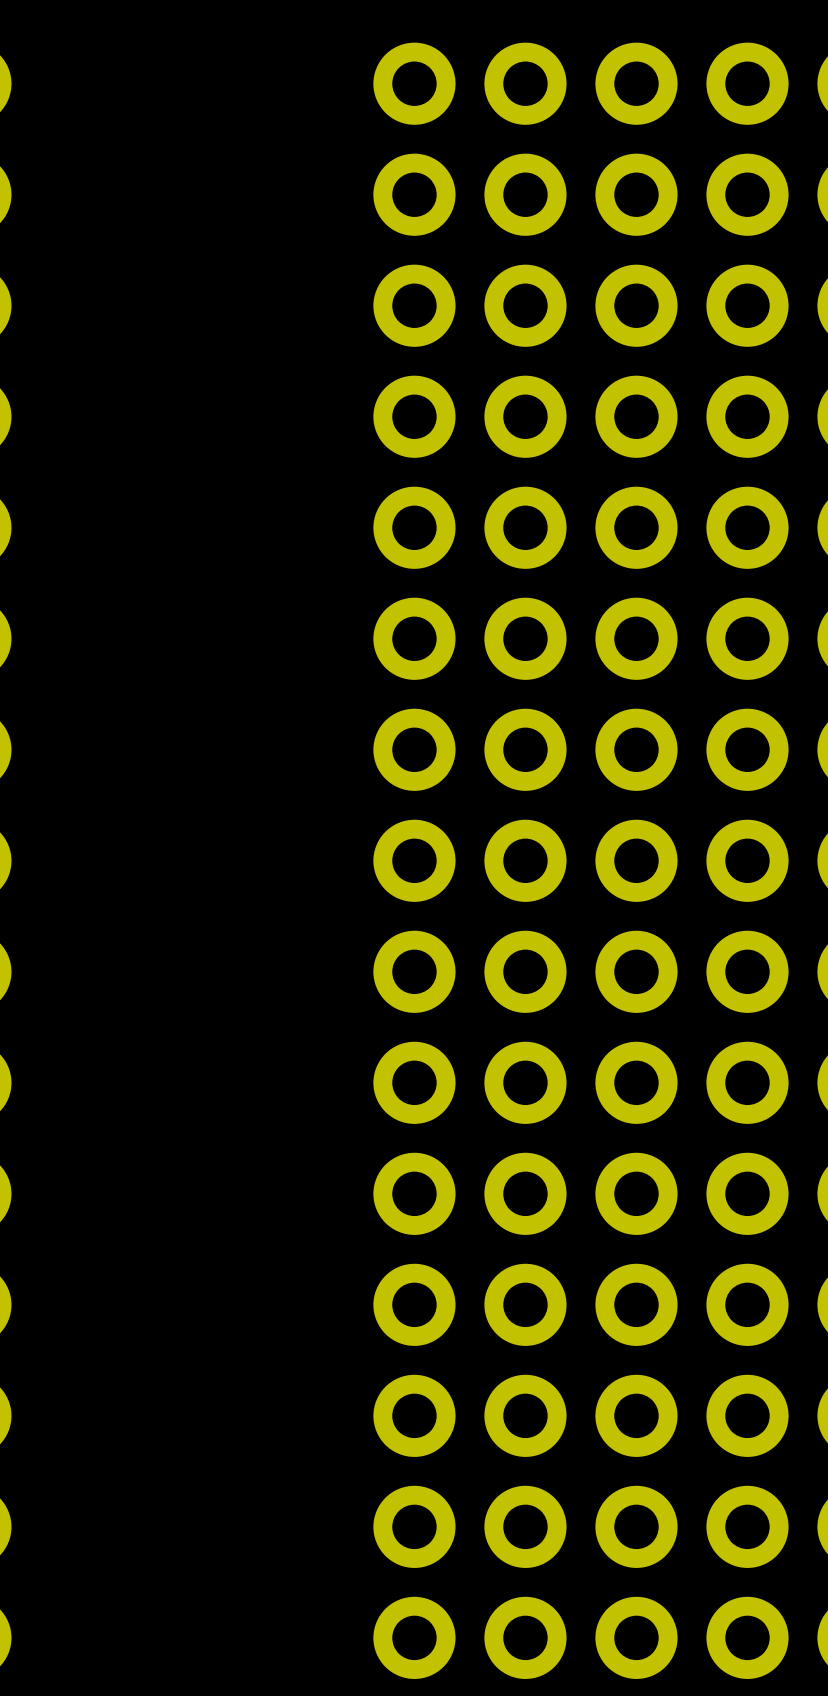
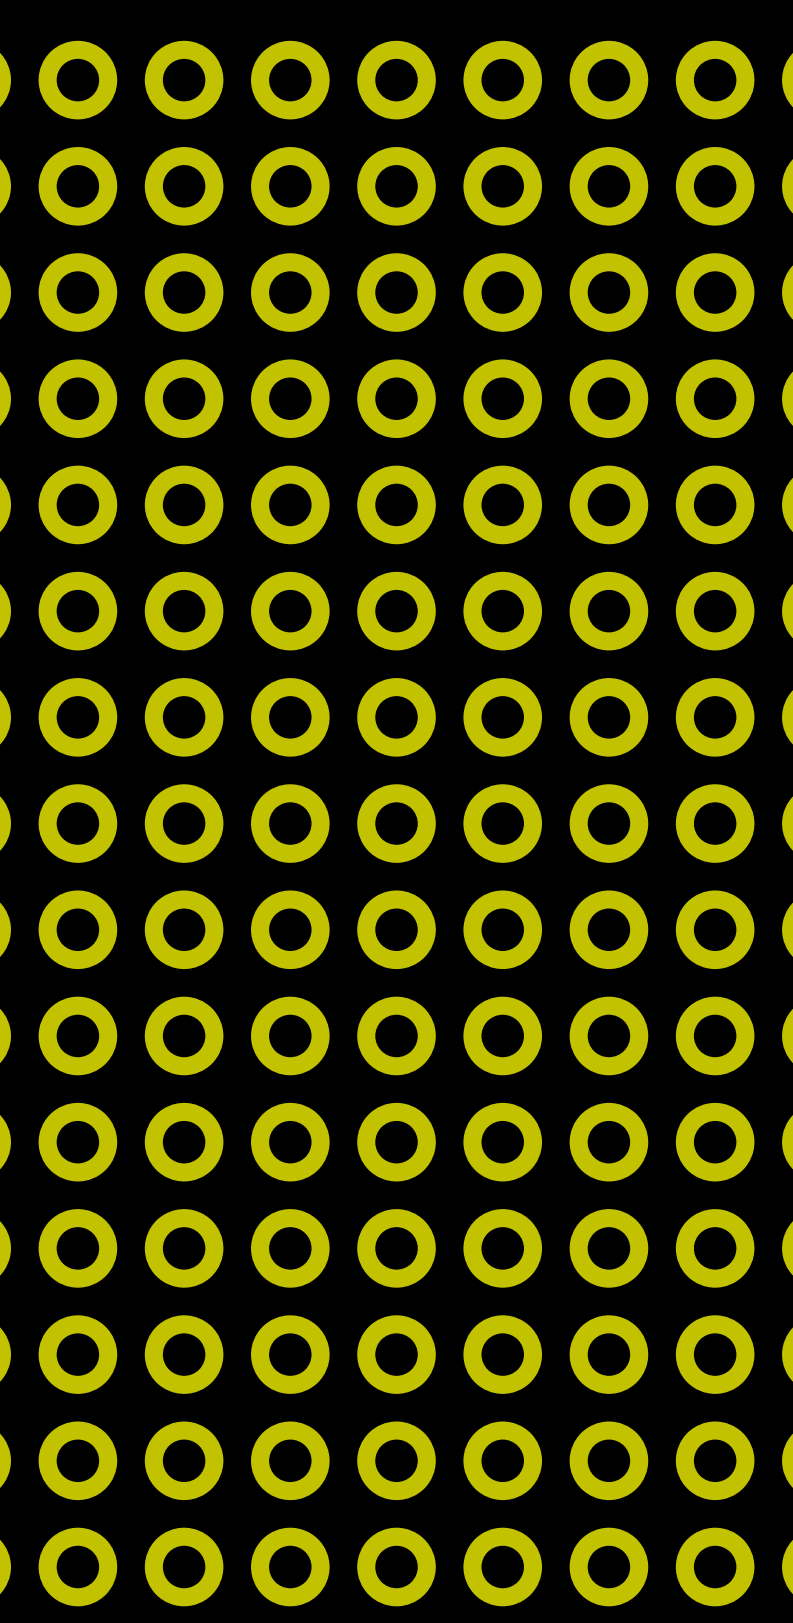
part: none -> (77, 823)
part: none -> (184, 823)
part: none -> (290, 823)

